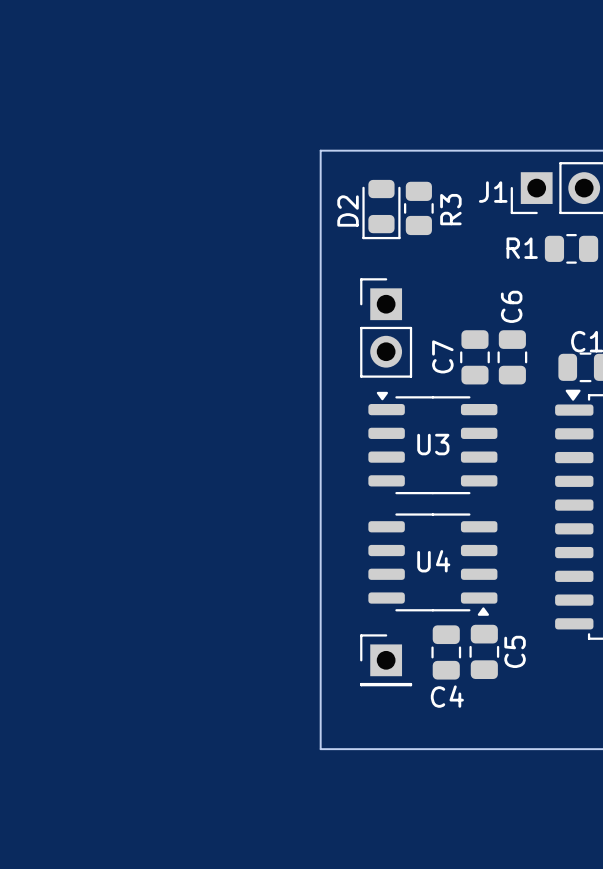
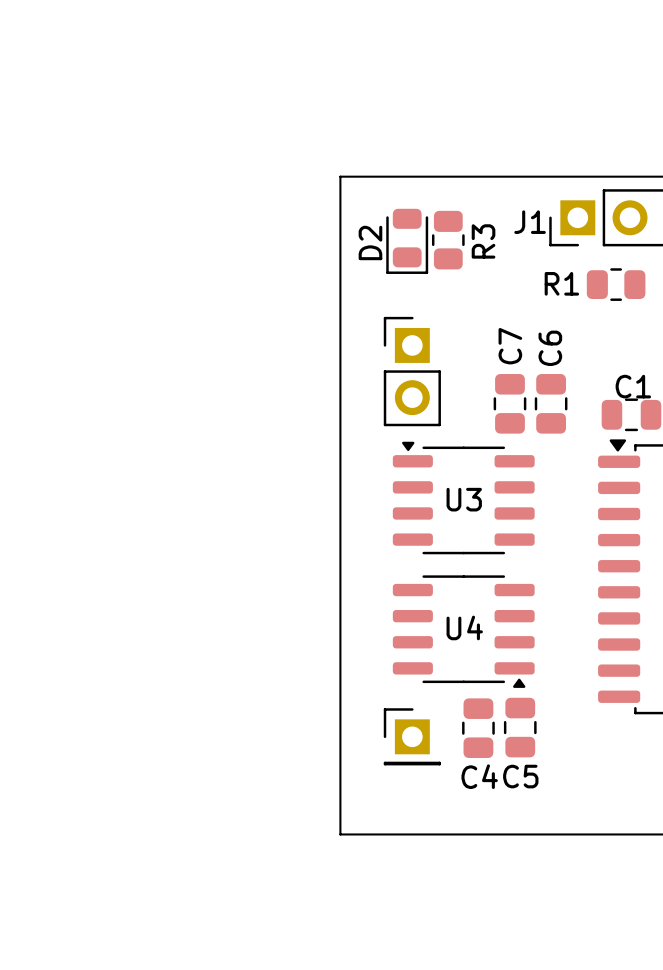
C7 name position: C7 (442, 356) -> C7 (510, 346)
C5 name rotation: 0° (515, 651) -> 90° clockwise (520, 776)
C5 name position: C5 (515, 651) -> C5 (520, 776)

